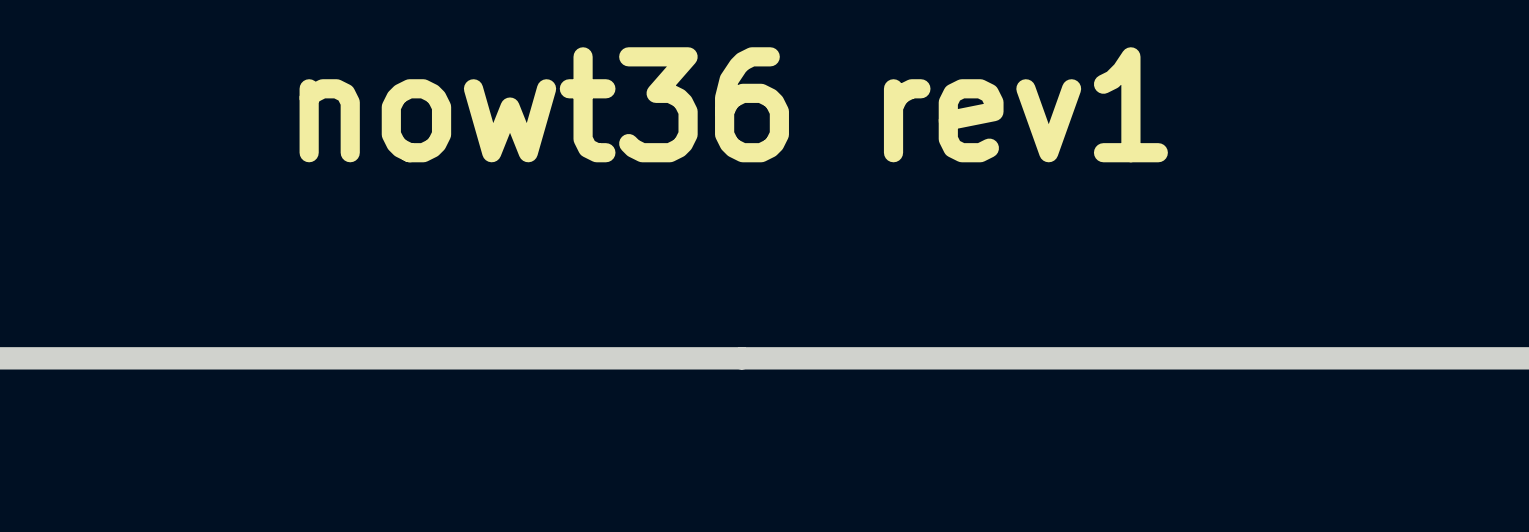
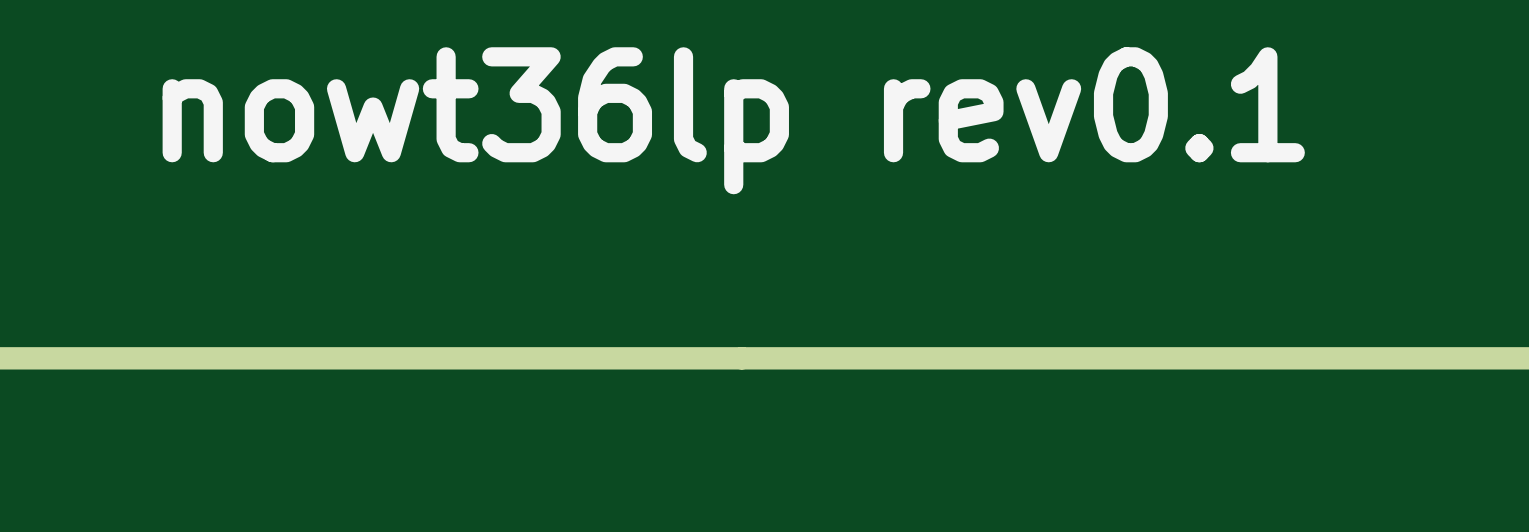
text: nowt36 rev1 (733, 104) -> nowt36lp rev0.1 (733, 120)

